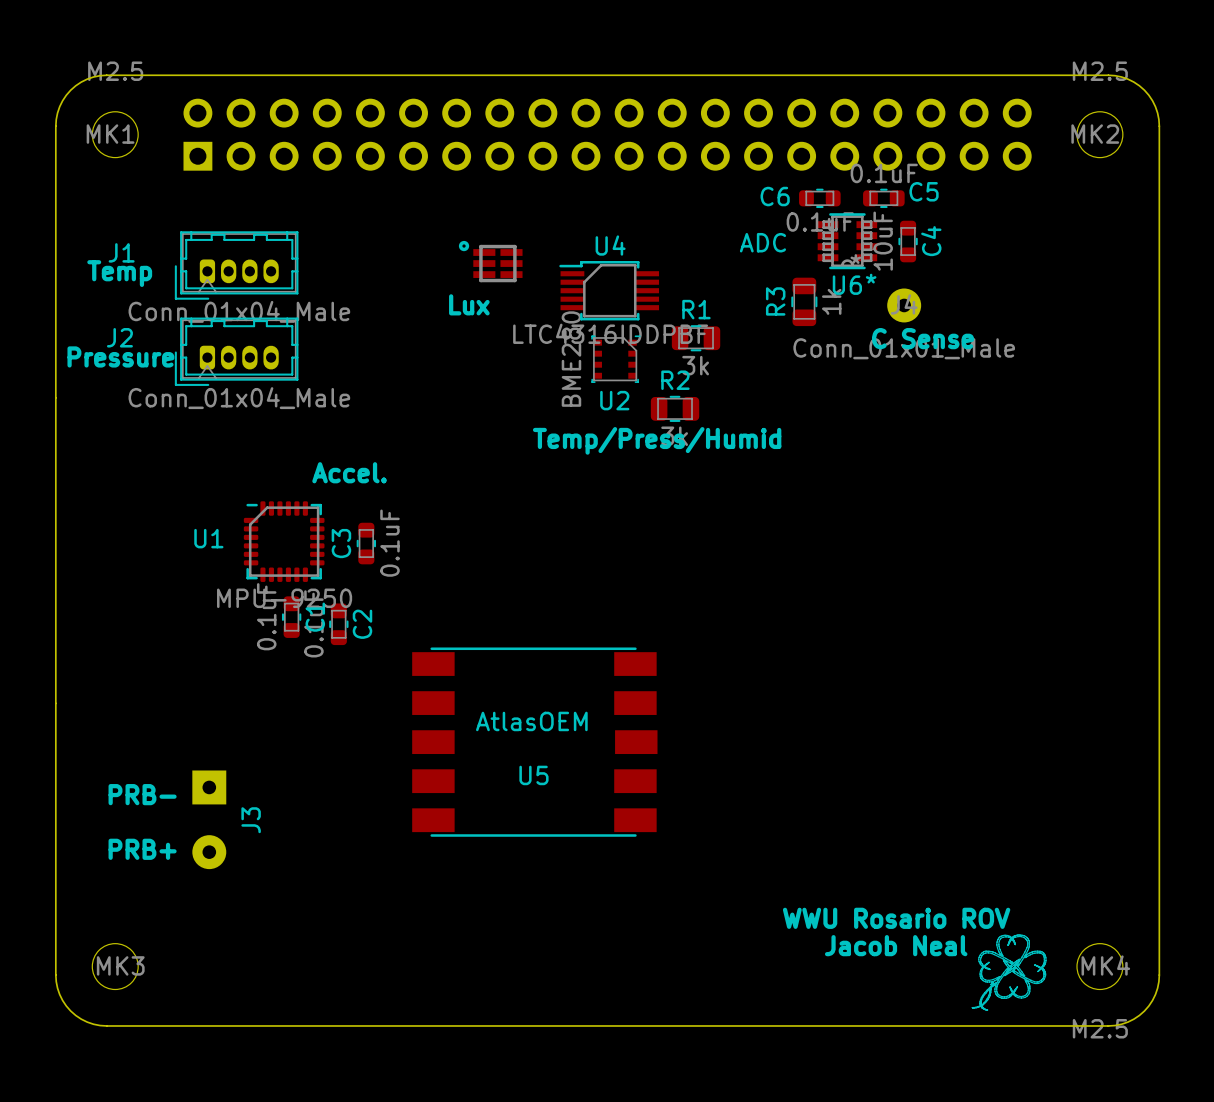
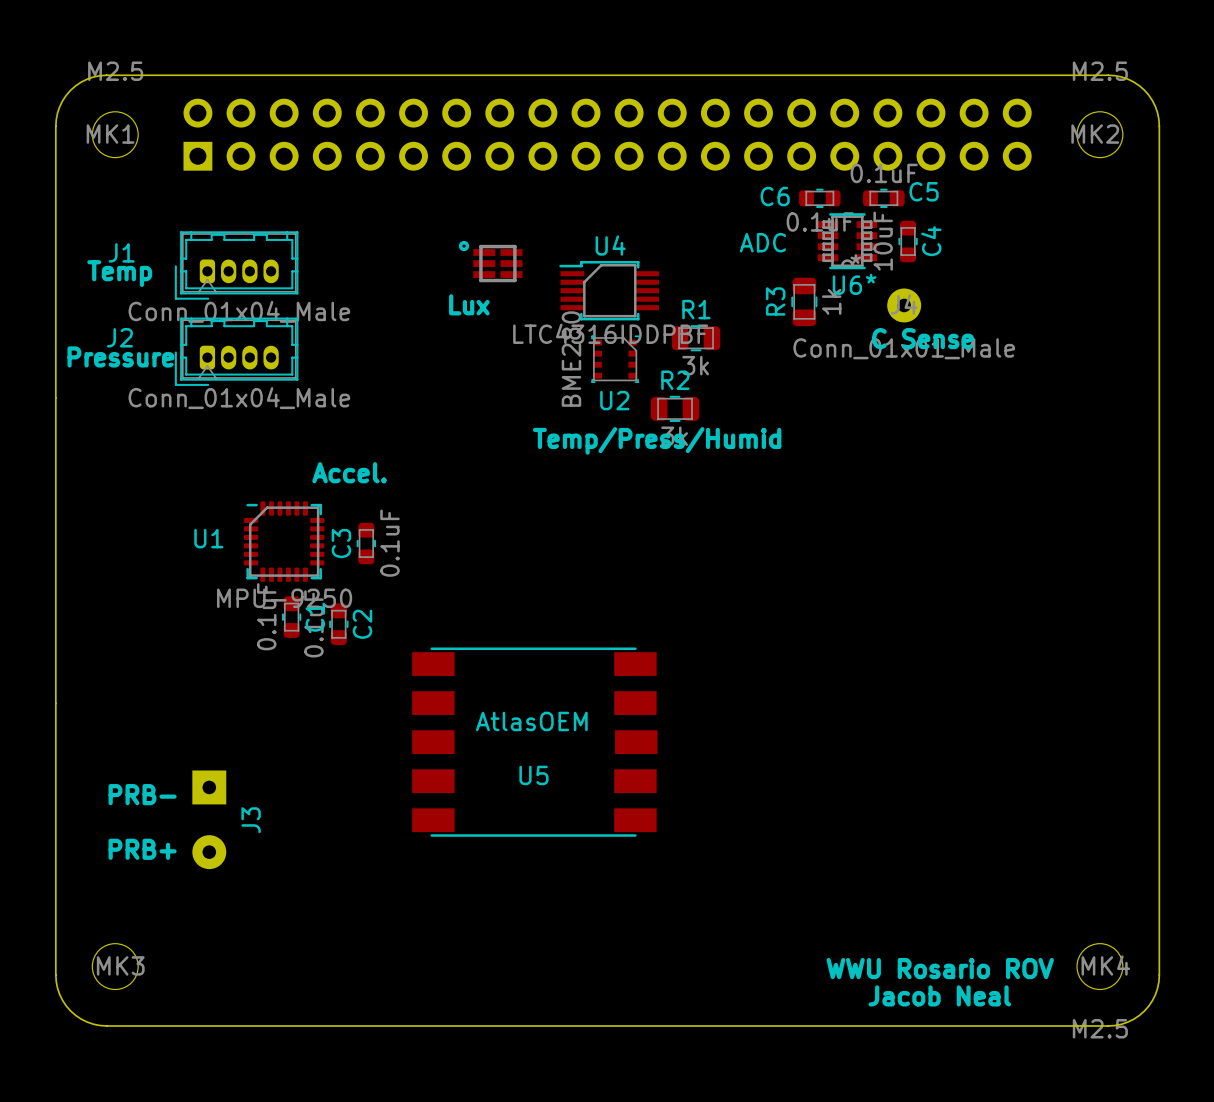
text position: WWU Rosario ROV (896, 918) -> WWU Rosario ROV (940, 968)
line: (1005, 935) (999, 937) (996, 942) (999, 951) (1002, 955) (998, 945) (1001, 938) (1009, 937) (1015, 944) (1012, 937) (1005, 935) -> none
line: (1017, 935) (1012, 937) (1023, 937) (1027, 943) (1018, 965) (1028, 950) (1029, 943) (1025, 936) (1017, 935) -> none
line: (1010, 939) (1008, 945) (1010, 939) -> none
text position: Jacob Neal (896, 945) -> Jacob Neal (939, 995)
line: (986, 951) (994, 952) (1012, 962) (987, 952) (981, 957) (981, 965) (979, 957) (986, 951) -> none
line: (1024, 957) (1033, 951) (1043, 953) (1045, 962) (1037, 971) -> none
line: (1024, 957) (1034, 953) (1043, 954) (1044, 962) (1037, 971) -> none
line: (1019, 959) (1010, 966) (1019, 959) -> none
line: (1003, 960) (1003, 960) (1004, 961) (1005, 963) (1007, 967) (1010, 968) (1003, 960) -> none
line: (988, 962) (982, 967) (980, 972) (981, 978) (986, 981) (994, 980) (999, 976) (988, 980) (982, 977) (982, 970) (983, 967) (988, 962) (989, 962) (988, 962) (988, 962) -> none
line: (1015, 964) (1024, 975) (1015, 965) -> none
line: (1034, 965) (1040, 967) (1034, 964) -> none
line: (985, 967) (986, 967) (989, 969) (985, 967) -> none
line: (1014, 967) (1015, 968) (1004, 975) (1014, 967) -> none
line: (1007, 968) (997, 984) (996, 991) (1003, 996) (1012, 994) (1007, 997) (1001, 998) (996, 994) (995, 987) (1007, 968) -> none
line: (1042, 968) (1043, 969) (1044, 970) (1045, 972) (1045, 977) (1037, 983) (1031, 982) (1013, 971) (1037, 981) (1043, 977) (1042, 968) -> none
line: (1025, 980) (1029, 985) (1029, 993) (1024, 997) (1016, 996) (1012, 993) (1009, 987) (1016, 995) (1024, 995) (1028, 989) (1025, 980) -> none
line: (992, 982) (991, 984) (992, 982) -> none
line: (995, 983) (982, 995) (980, 1004) (983, 996) (995, 983) -> none
line: (1017, 986) (1014, 991) (1017, 986) -> none
line: (991, 988) (989, 996) (985, 1002) (979, 1006) (972, 1007) -> none
line: (990, 989) (983, 1003) (972, 1007) -> none
line: (987, 1009) (981, 1007) (987, 1010) -> none

